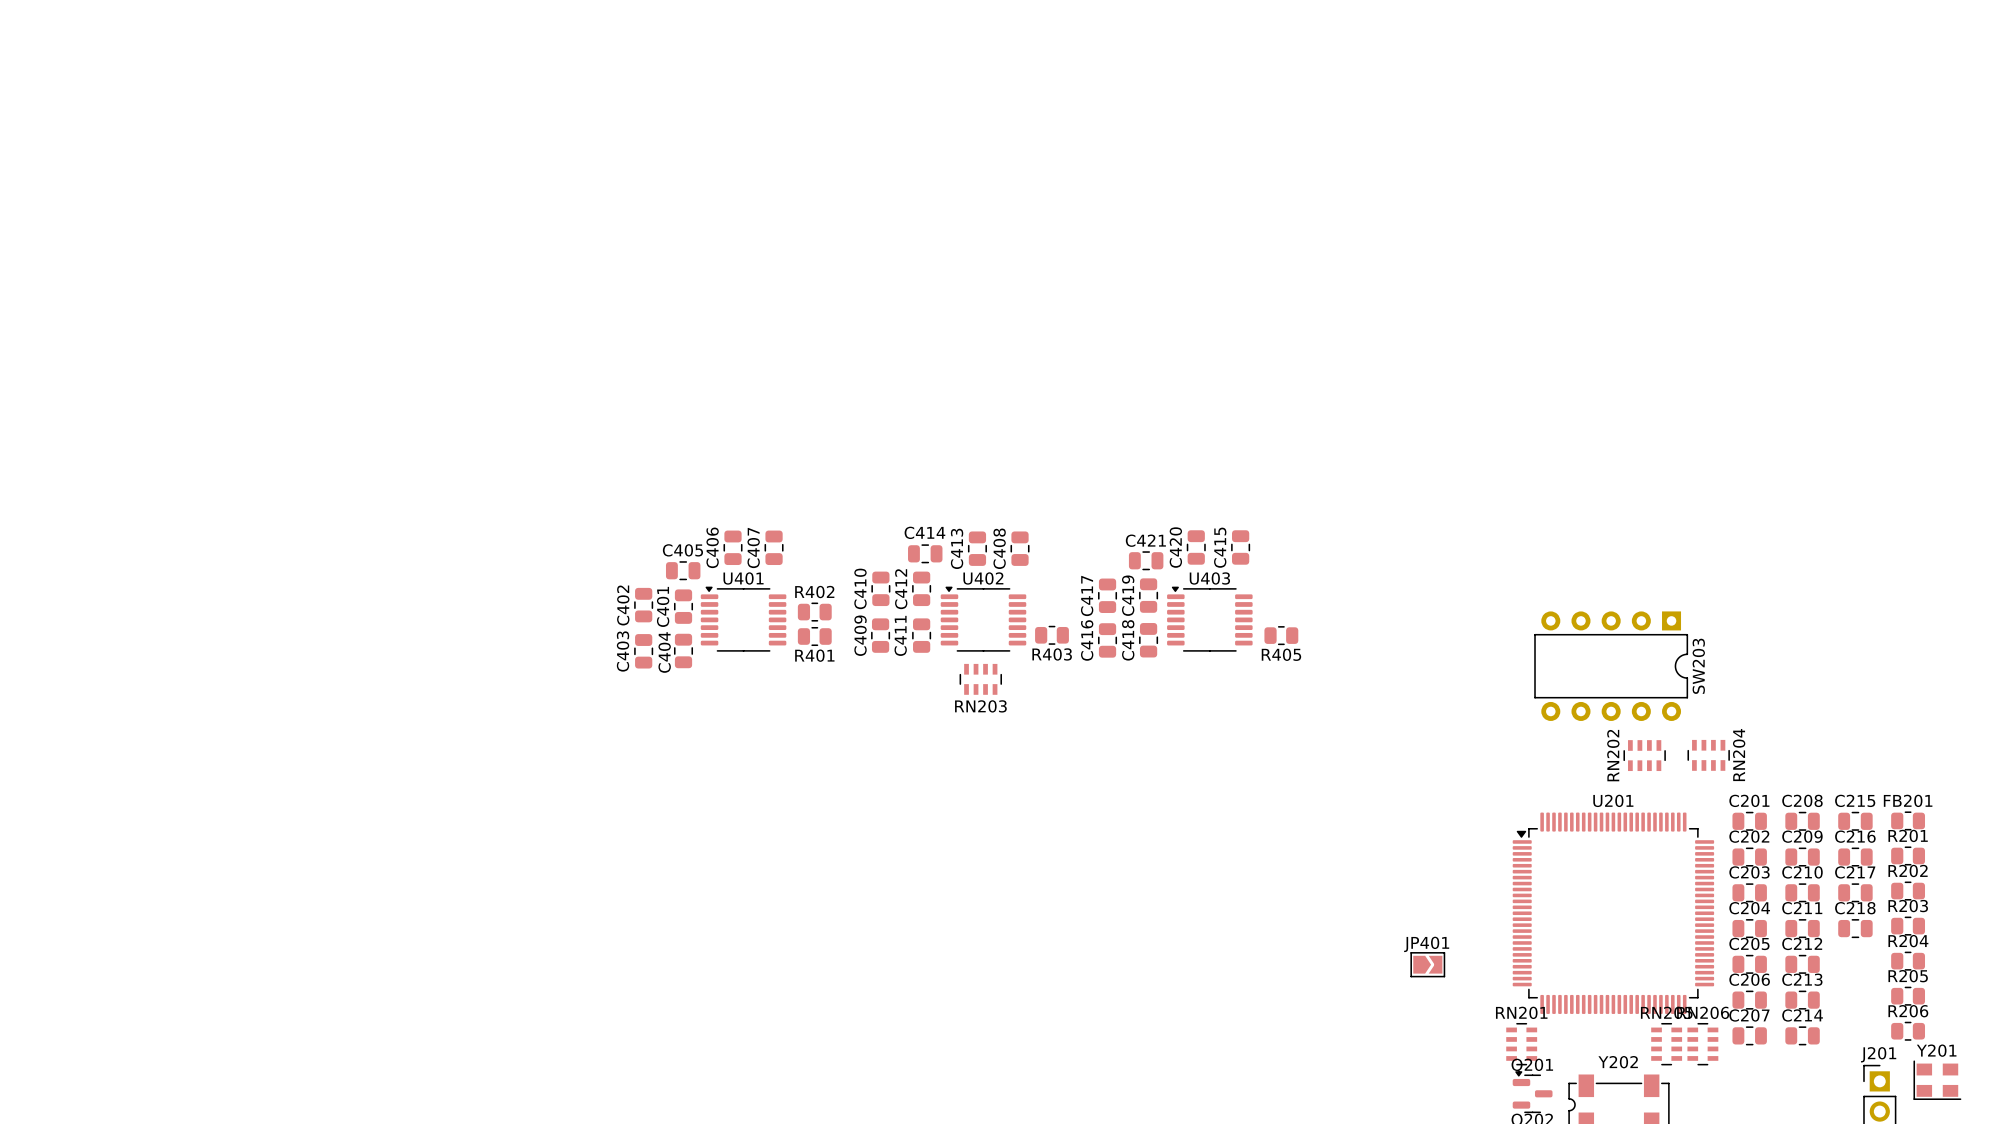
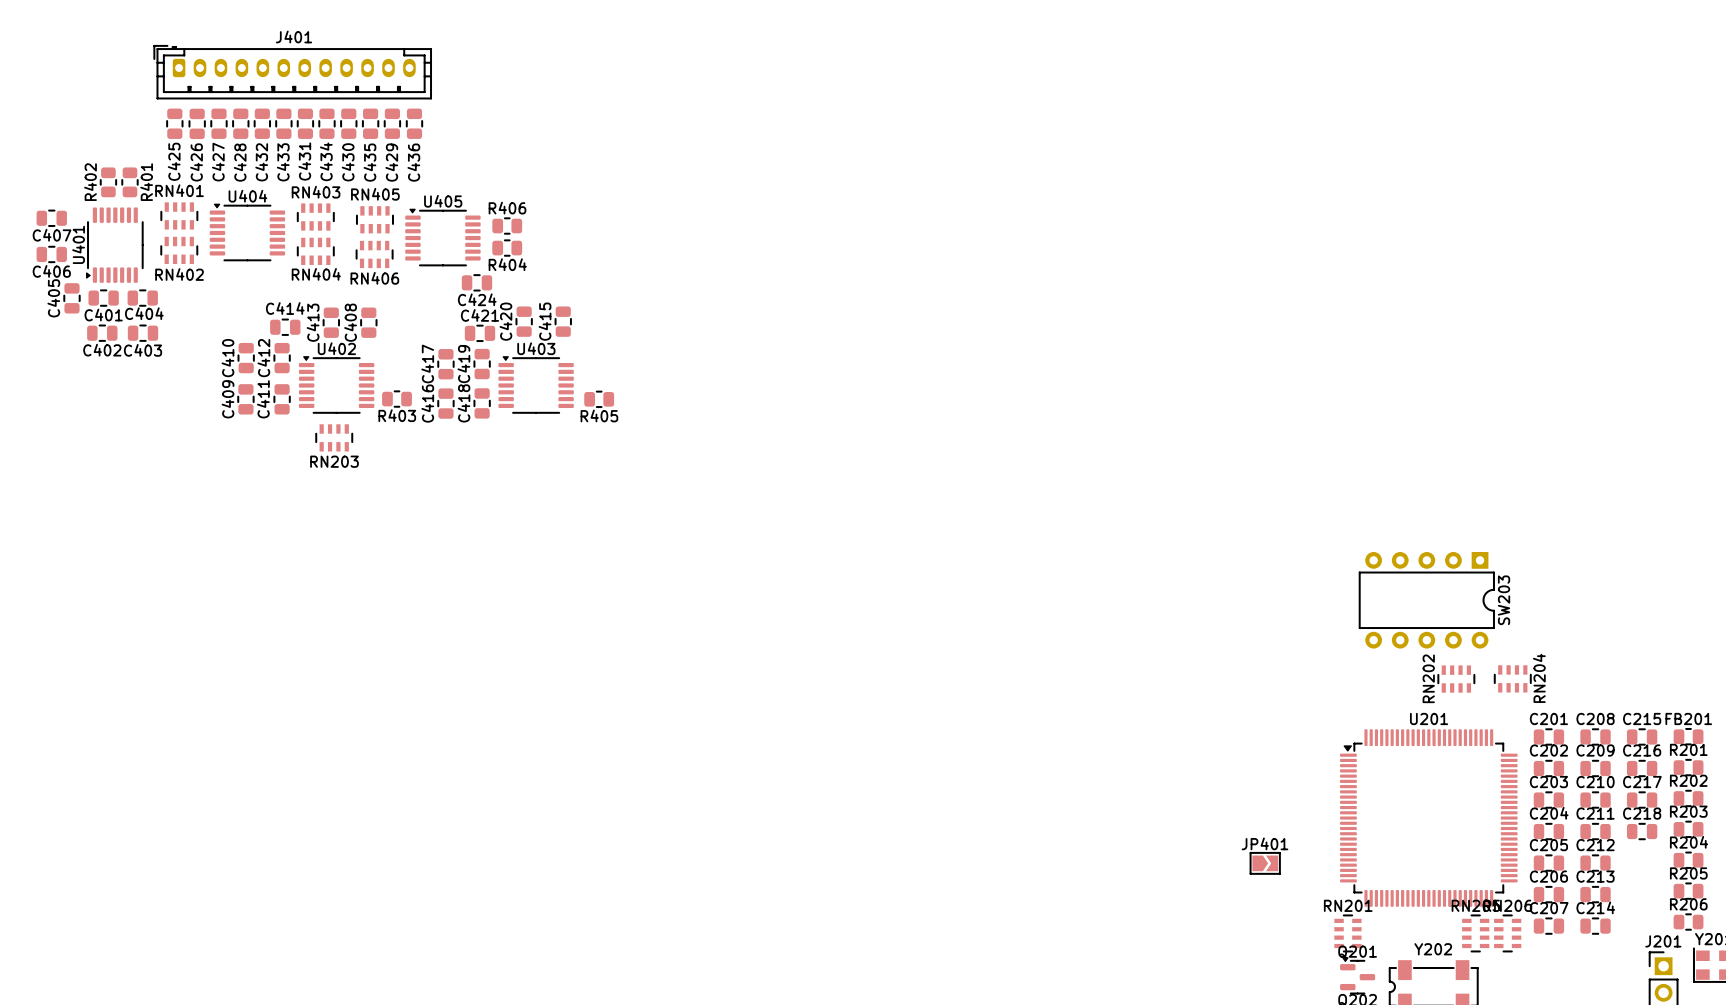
J401: none -> (292, 72)
C425: none -> (174, 123)
C426: none -> (197, 123)
C427: none -> (218, 123)
C428: none -> (240, 123)
C432: none -> (262, 123)
C433: none -> (283, 123)
C431: none -> (305, 123)
C434: none -> (326, 123)
C430: none -> (348, 123)
C435: none -> (370, 123)
C429: none -> (392, 123)
C436: none -> (414, 123)
RN401: none -> (179, 215)
RN403: none -> (315, 217)
RN405: none -> (374, 219)
R406: none -> (507, 226)
U404: none -> (247, 232)
U405: none -> (442, 237)
R404: none -> (507, 248)
RN402: none -> (179, 250)
RN404: none -> (315, 251)
RN406: none -> (374, 254)
C424: none -> (477, 282)
C406 name position: C406 (712, 547) -> C406 (51, 271)
C406 rotation: 0° (733, 547) -> 90° clockwise (51, 254)
C406 position: (733, 547) -> (51, 254)
C407 rotation: 0° (774, 547) -> 90° clockwise (51, 218)
C407 position: (774, 547) -> (51, 218)
C420 position: (1196, 547) -> (524, 321)
C415 position: (1240, 547) -> (563, 321)
C407 name position: C407 (753, 548) -> C407 (52, 235)
C413 position: (977, 548) -> (331, 322)
C408 position: (1020, 548) -> (368, 322)
C405 name position: C405 (682, 550) -> C405 (53, 298)
C414 position: (925, 553) -> (285, 327)
C421 position: (1146, 560) -> (480, 333)
C405 rotation: 0° (683, 570) -> 90° clockwise (71, 298)
C405 position: (683, 570) -> (71, 298)
C410 position: (880, 588) -> (246, 358)
C412 position: (921, 588) -> (282, 358)
R402 name position: R402 (814, 592) -> R402 (90, 182)
C417 position: (1107, 595) -> (445, 364)
C419 position: (1148, 595) -> (482, 364)
C402 name position: C402 (623, 605) -> C402 (102, 350)
C402 rotation: 0° (643, 605) -> 90° clockwise (102, 333)
C402 position: (643, 605) -> (102, 333)
C401 name position: C401 (663, 606) -> C401 (103, 315)
C401 rotation: 0° (683, 606) -> 90° clockwise (103, 298)
C401 position: (683, 606) -> (103, 298)
R402 rotation: 0° (814, 612) -> 90° clockwise (108, 182)
R402 position: (814, 612) -> (108, 182)
U401 rotation: 0° (743, 619) -> 90° counterclockwise (114, 245)
U401 position: (743, 619) -> (114, 245)
U402 position: (983, 619) -> (336, 384)
U403 position: (1209, 619) -> (536, 384)
C409 position: (880, 635) -> (245, 399)
C411 position: (921, 635) -> (282, 399)
R403 position: (1052, 635) -> (397, 399)
R405 position: (1281, 635) -> (599, 399)
R401 rotation: 0° (814, 636) -> 90° clockwise (129, 182)
R401 position: (814, 636) -> (129, 182)
C416 position: (1107, 640) -> (445, 403)
C418 position: (1148, 640) -> (482, 403)
C404 rotation: 0° (683, 650) -> 90° clockwise (142, 298)
C404 position: (683, 650) -> (142, 298)
C403 name position: C403 (623, 651) -> C403 (143, 350)
C403 rotation: 0° (643, 651) -> 90° clockwise (143, 333)
C403 position: (643, 651) -> (143, 333)
C404 name position: C404 (664, 652) -> C404 (144, 313)
R401 name position: R401 (814, 655) -> R401 (146, 182)
RN203 position: (980, 679) -> (334, 437)

